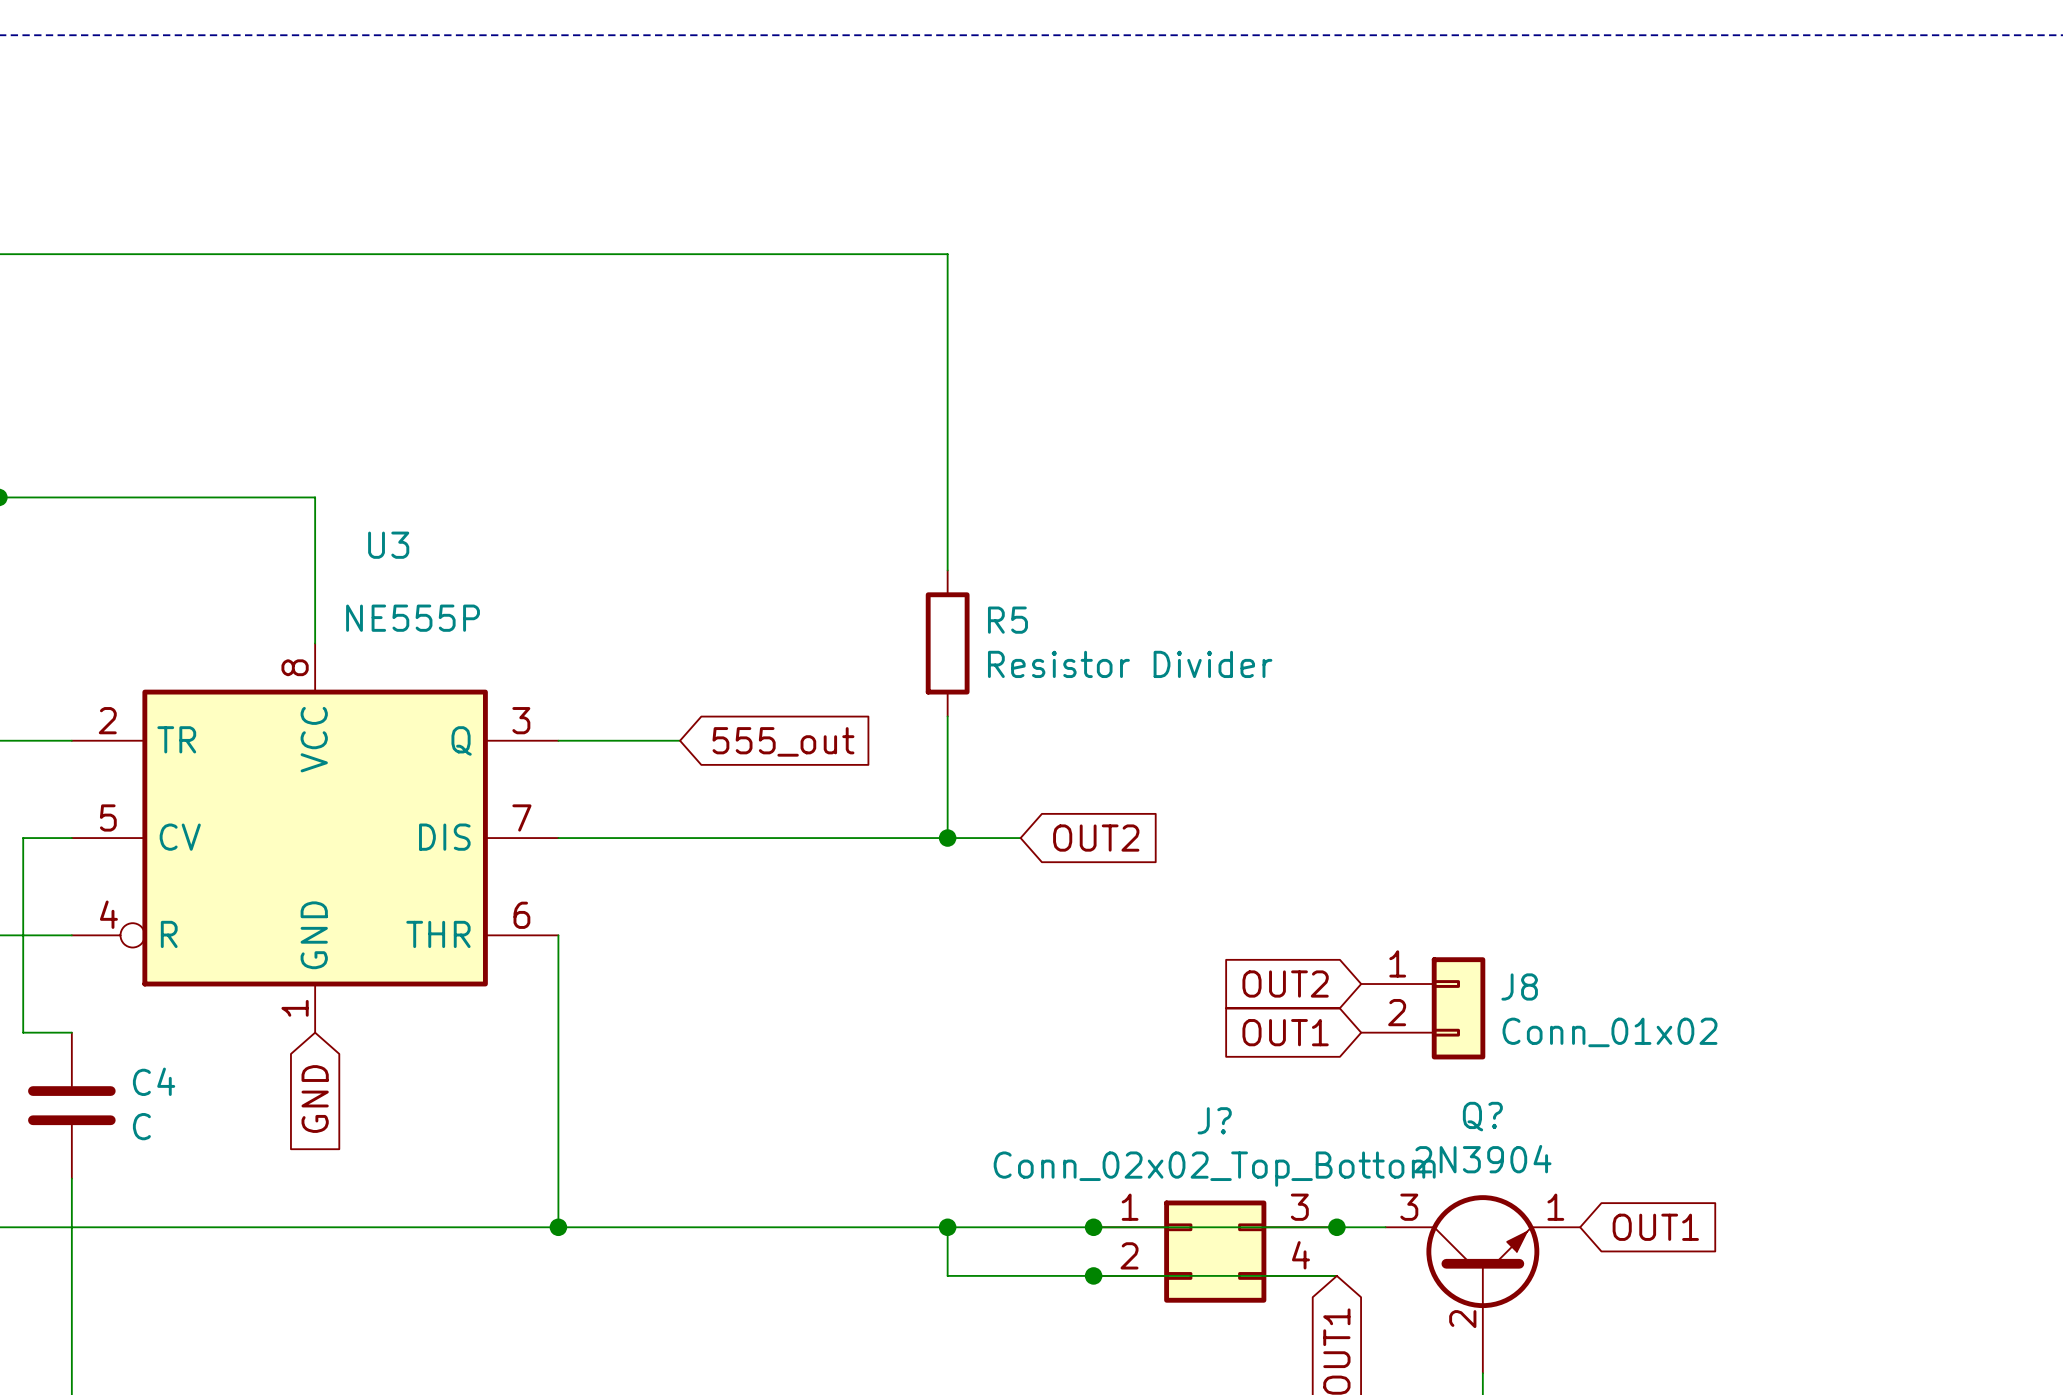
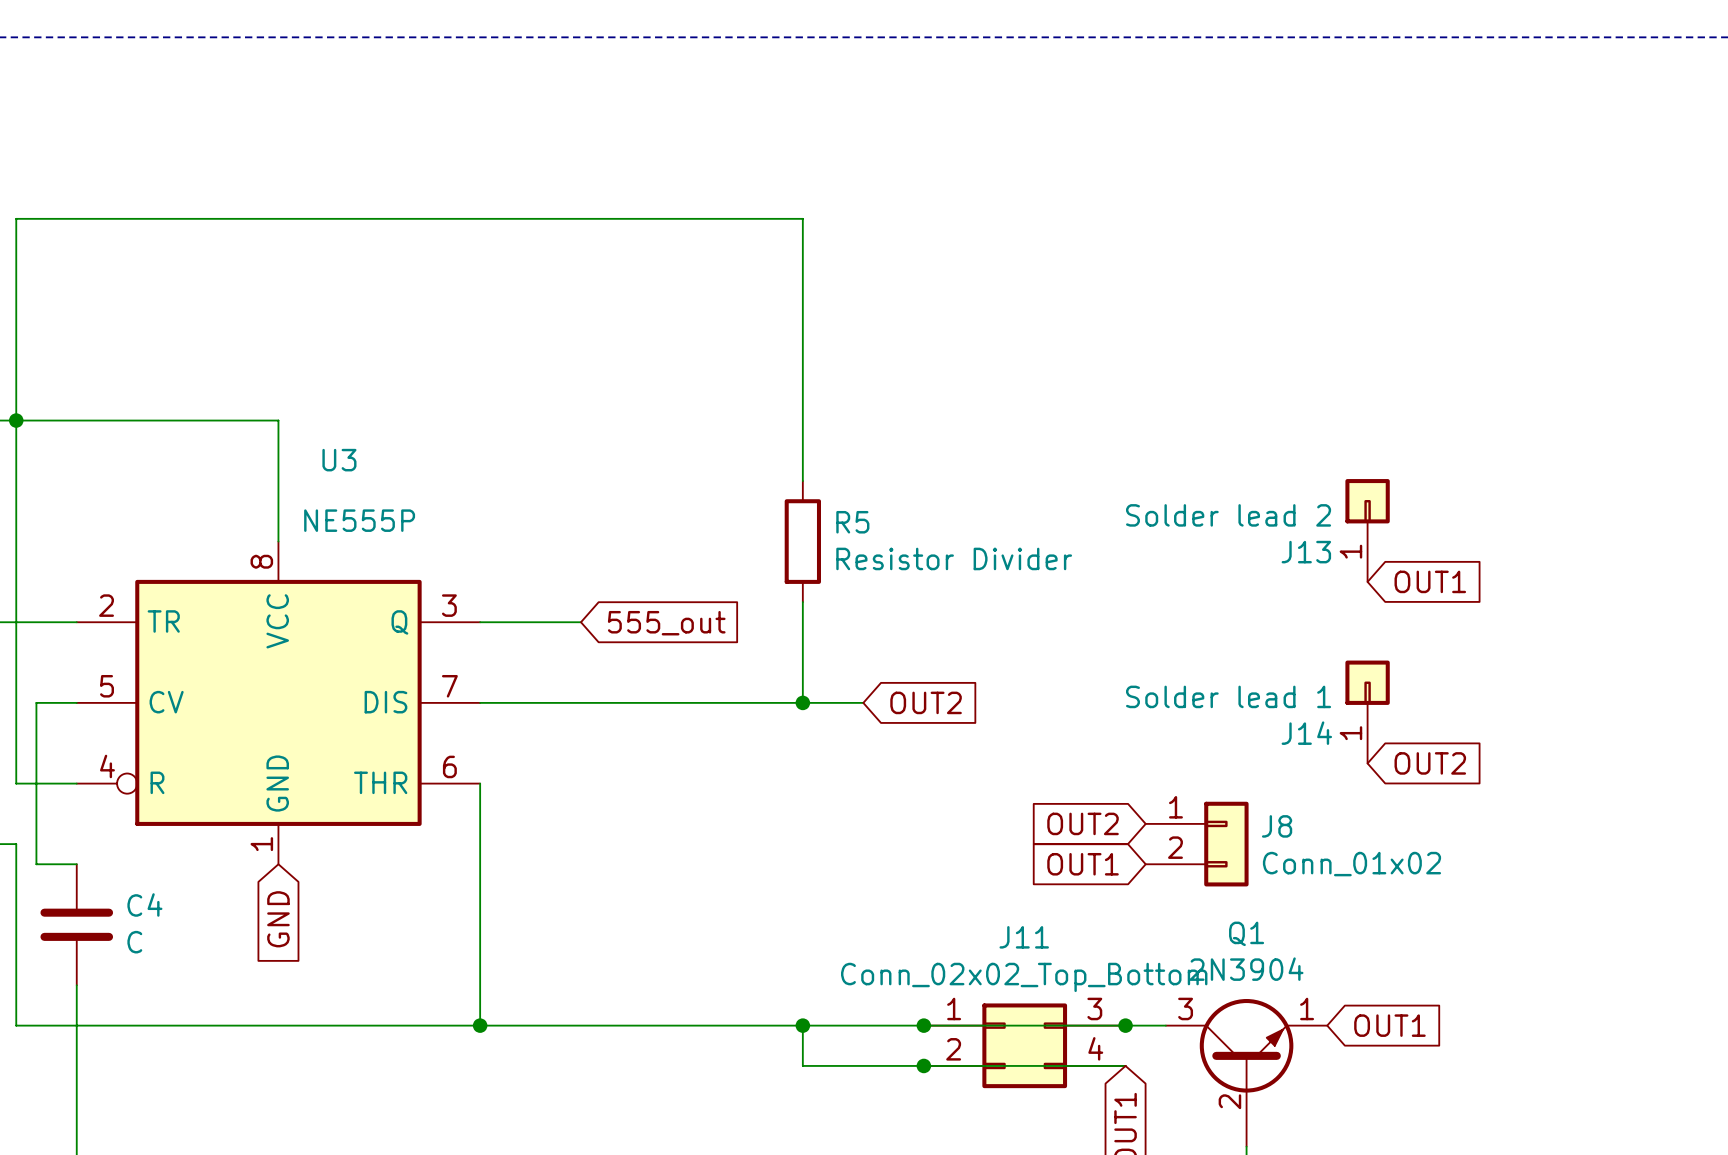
J13: none -> Solder lead 2 (1367, 530)
global label: none -> OUT1 (1430, 581)
J14: none -> Solder lead 1 (1367, 711)
global label: none -> OUT2 (1430, 763)
Q? name: Q? (1482, 1116) -> Q1 (1246, 933)
J? name: J? (1214, 1120) -> J11 (1024, 937)

